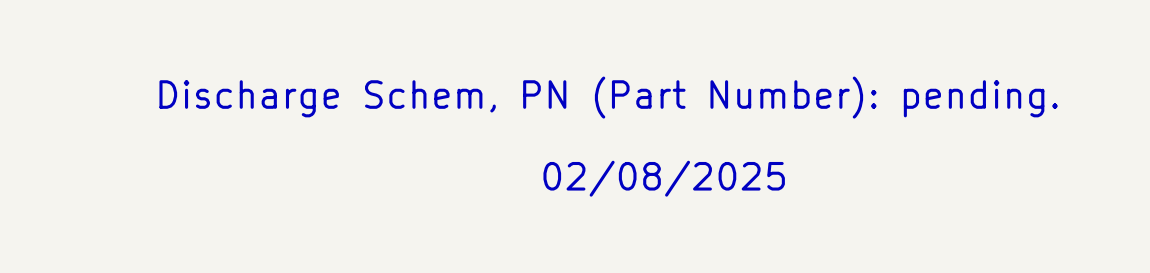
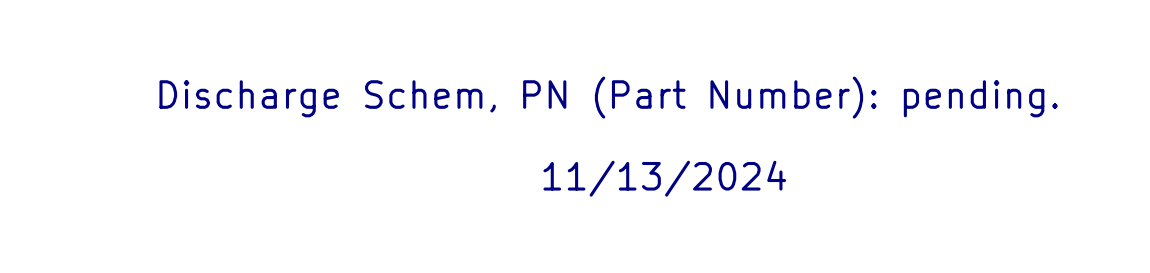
text: 02/08/2025 (664, 178) -> 11/13/2024 (664, 178)

